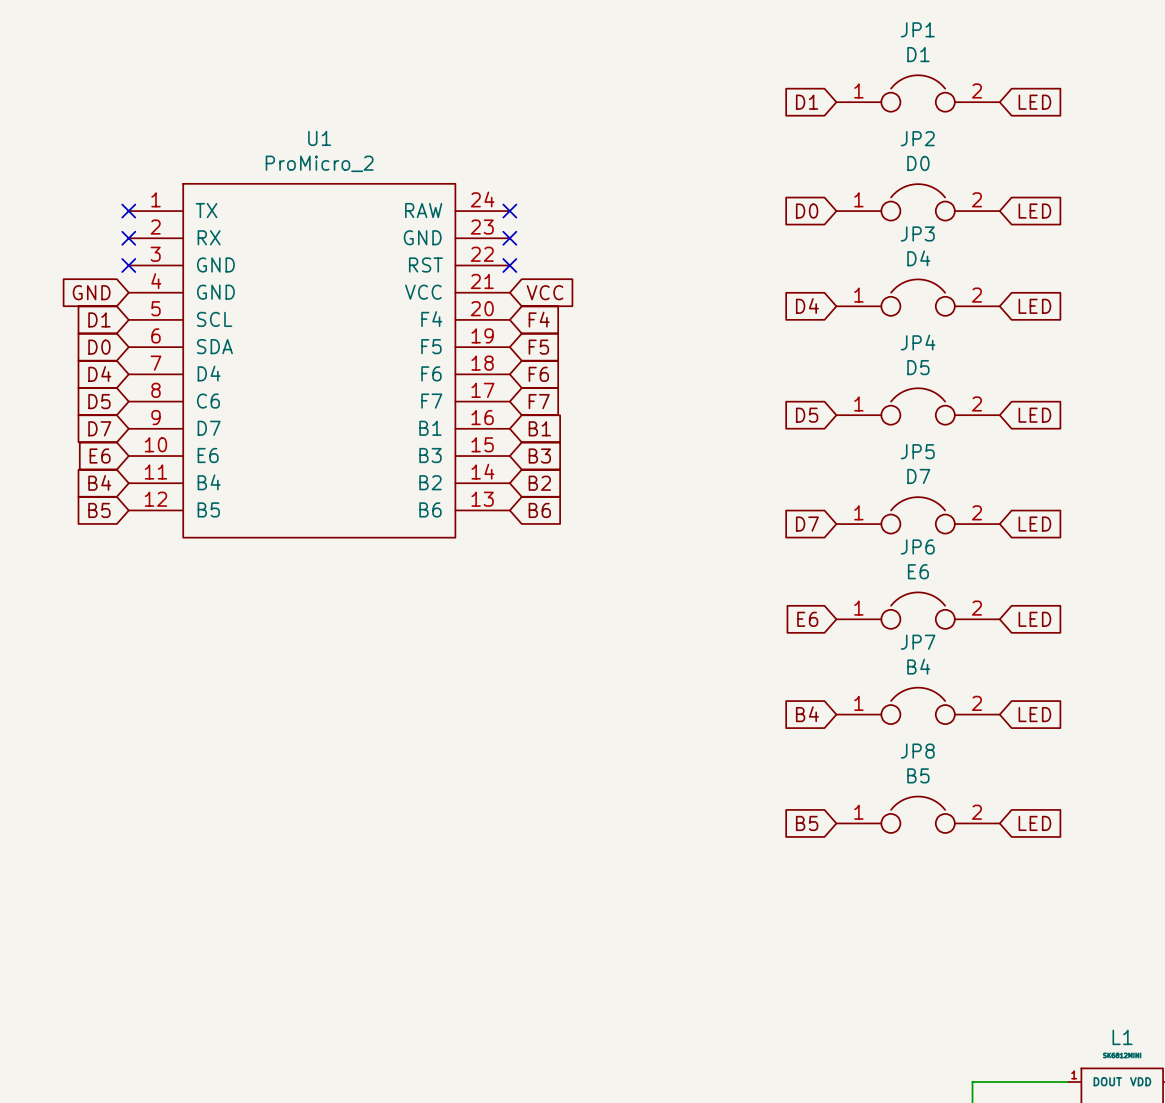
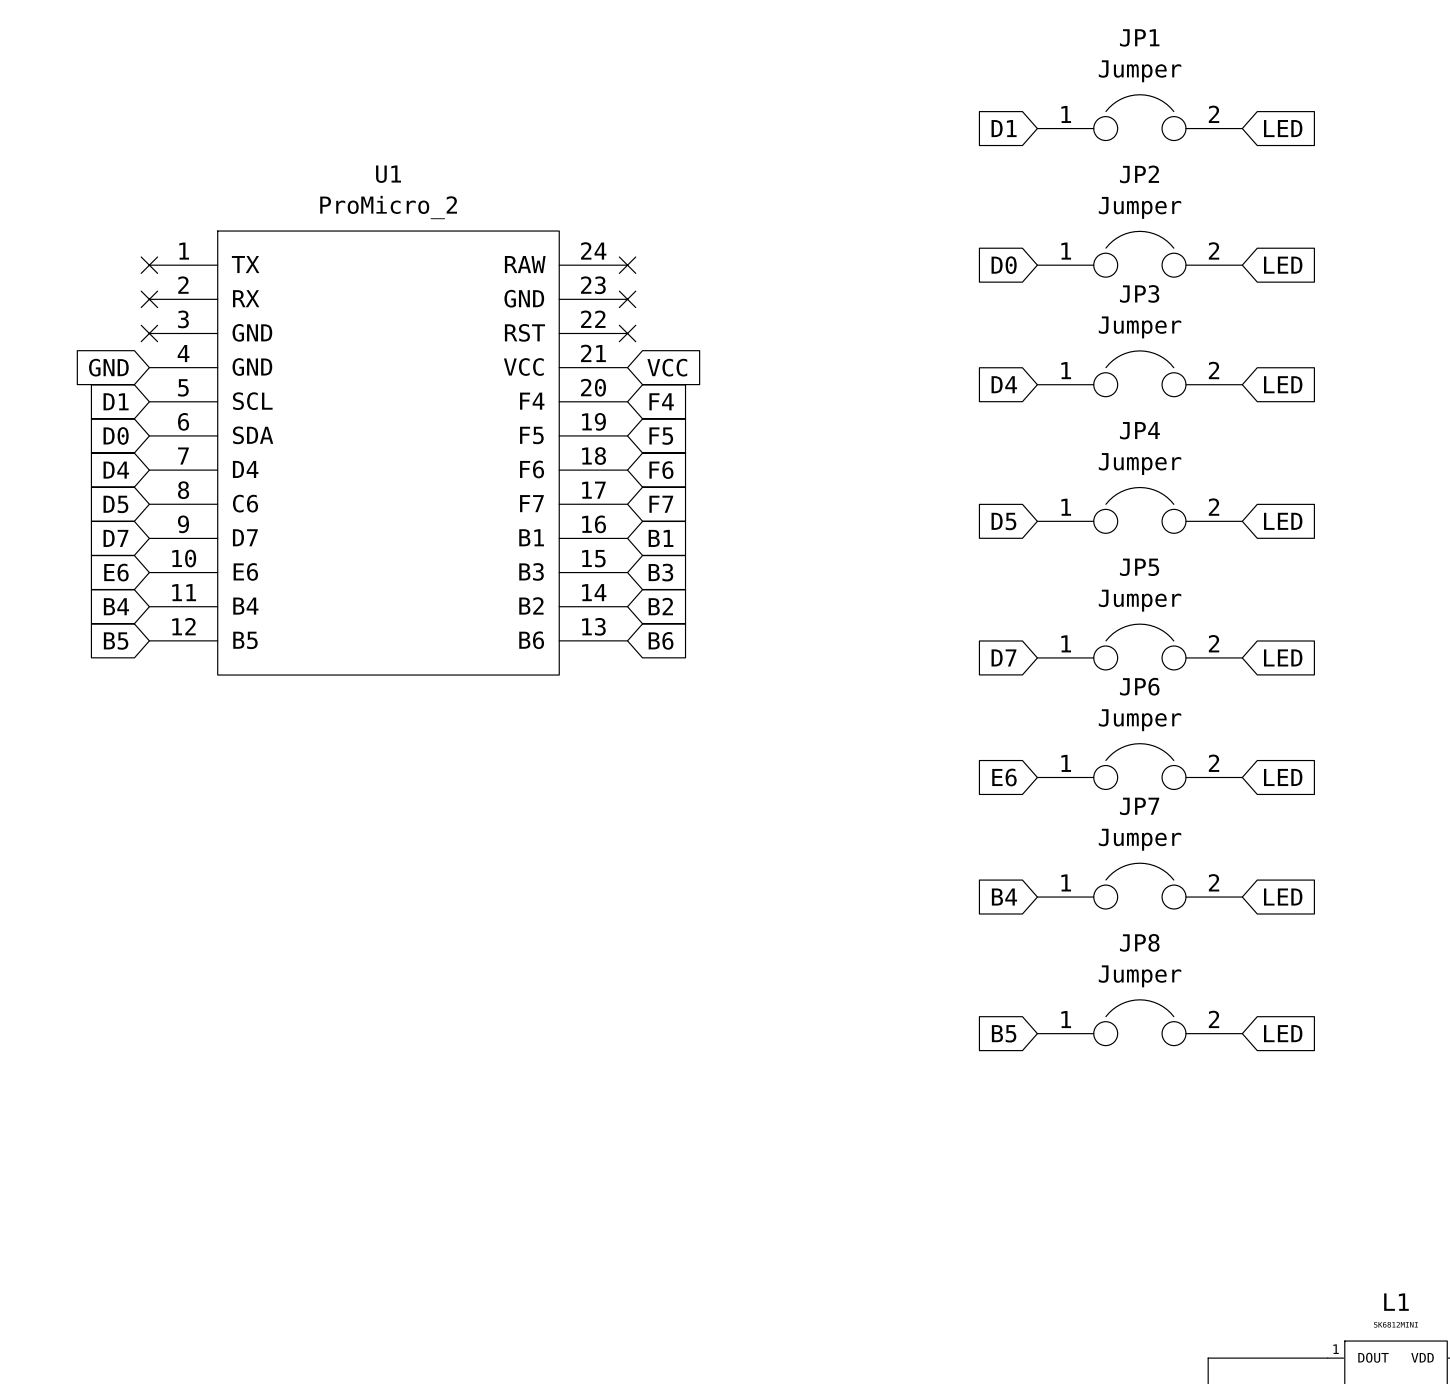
JP1 value: D1 (918, 54) -> Jumper (1140, 71)
JP2 value: D0 (918, 163) -> Jumper (1140, 207)
JP3 value: D4 (918, 258) -> Jumper (1140, 327)
JP4 value: D5 (918, 367) -> Jumper (1140, 464)
JP5 value: D7 (918, 476) -> Jumper (1140, 600)
JP6 value: E6 (918, 571) -> Jumper (1140, 720)
JP7 value: B4 (918, 666) -> Jumper (1140, 839)
JP8 value: B5 (918, 775) -> Jumper (1140, 976)

